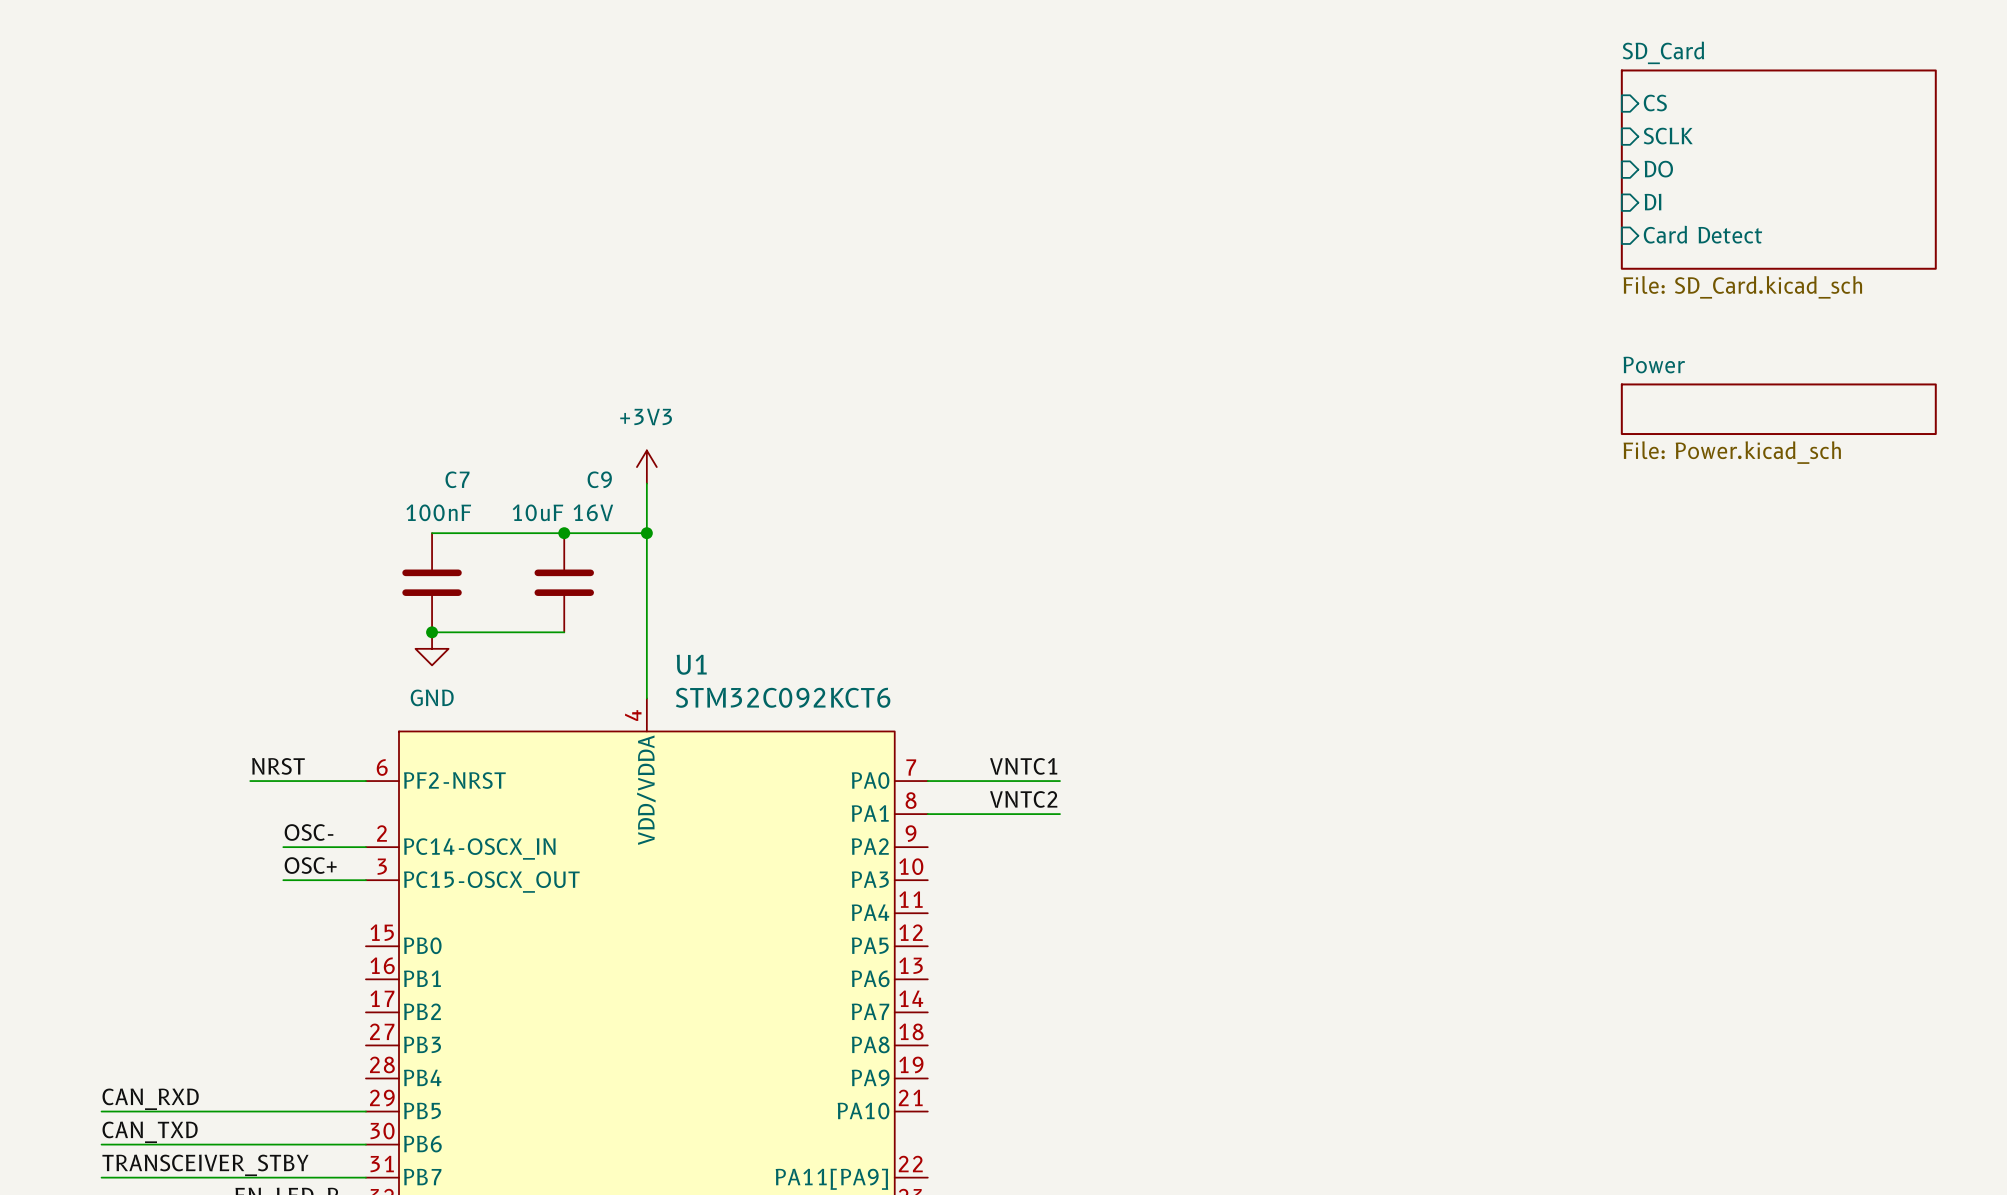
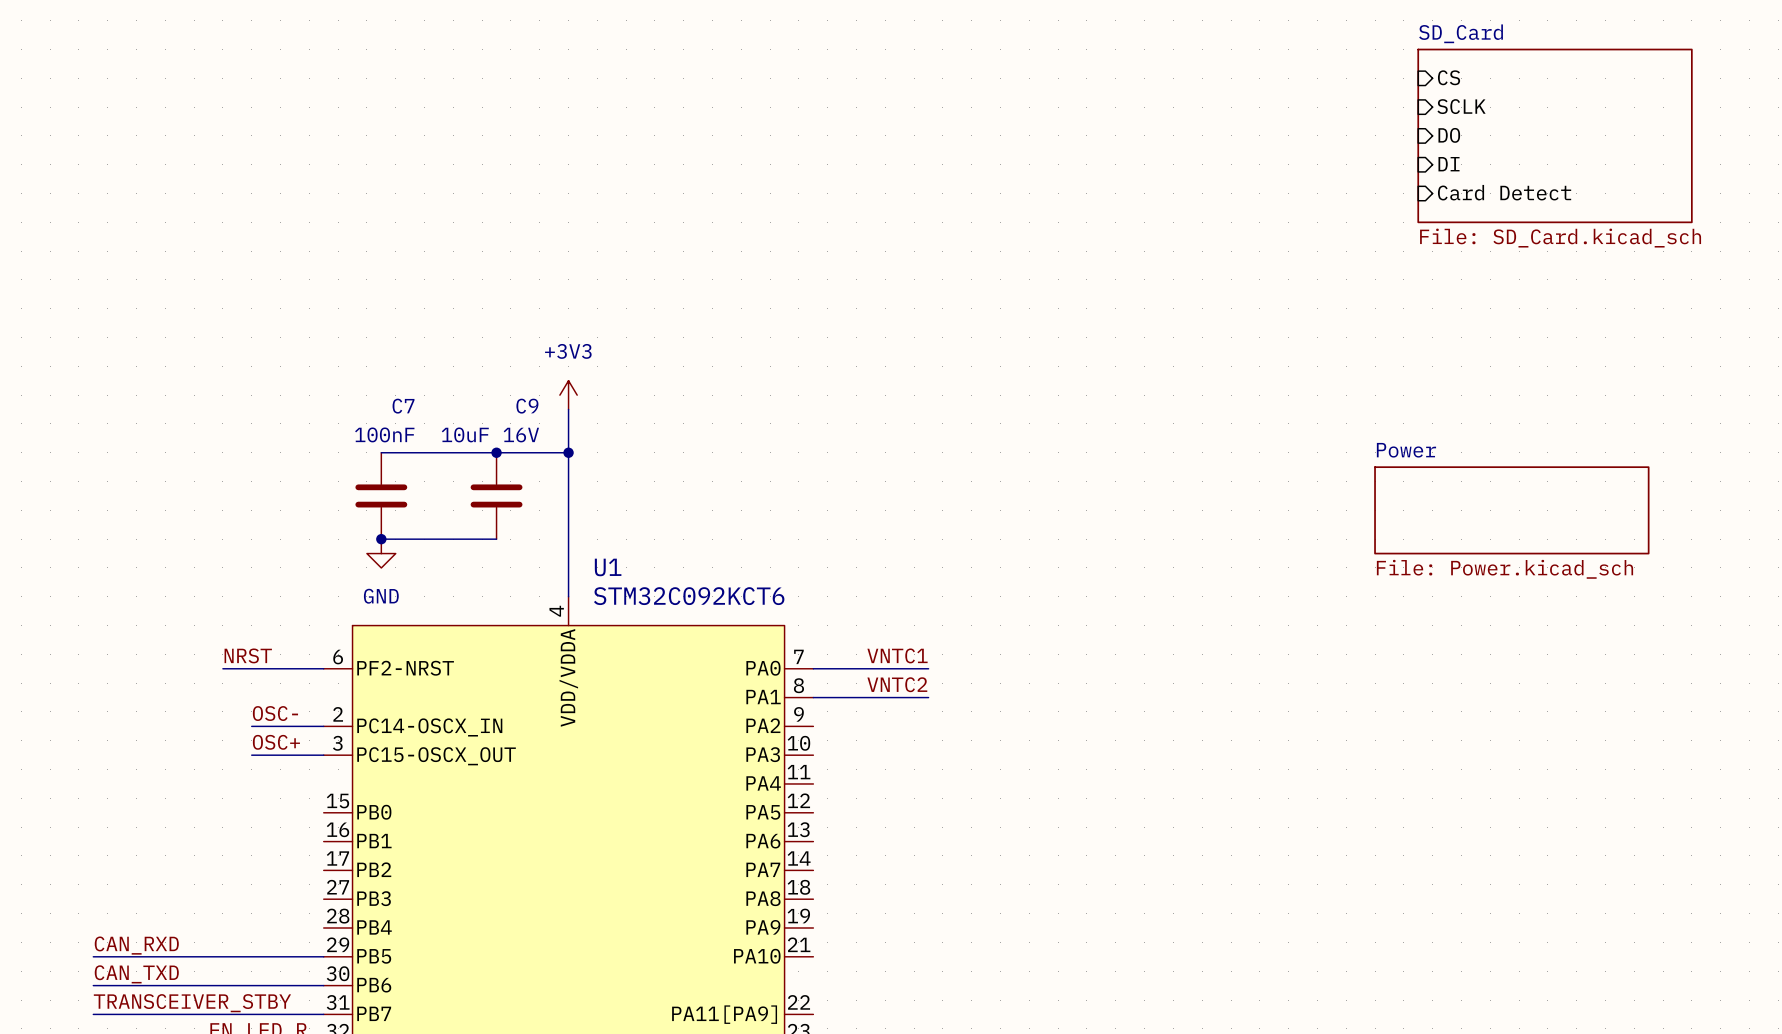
sheet Power: File: Power.kicad_sch (1778, 409) -> none
sheet Power: none -> File: Power.kicad_sch (1511, 510)

